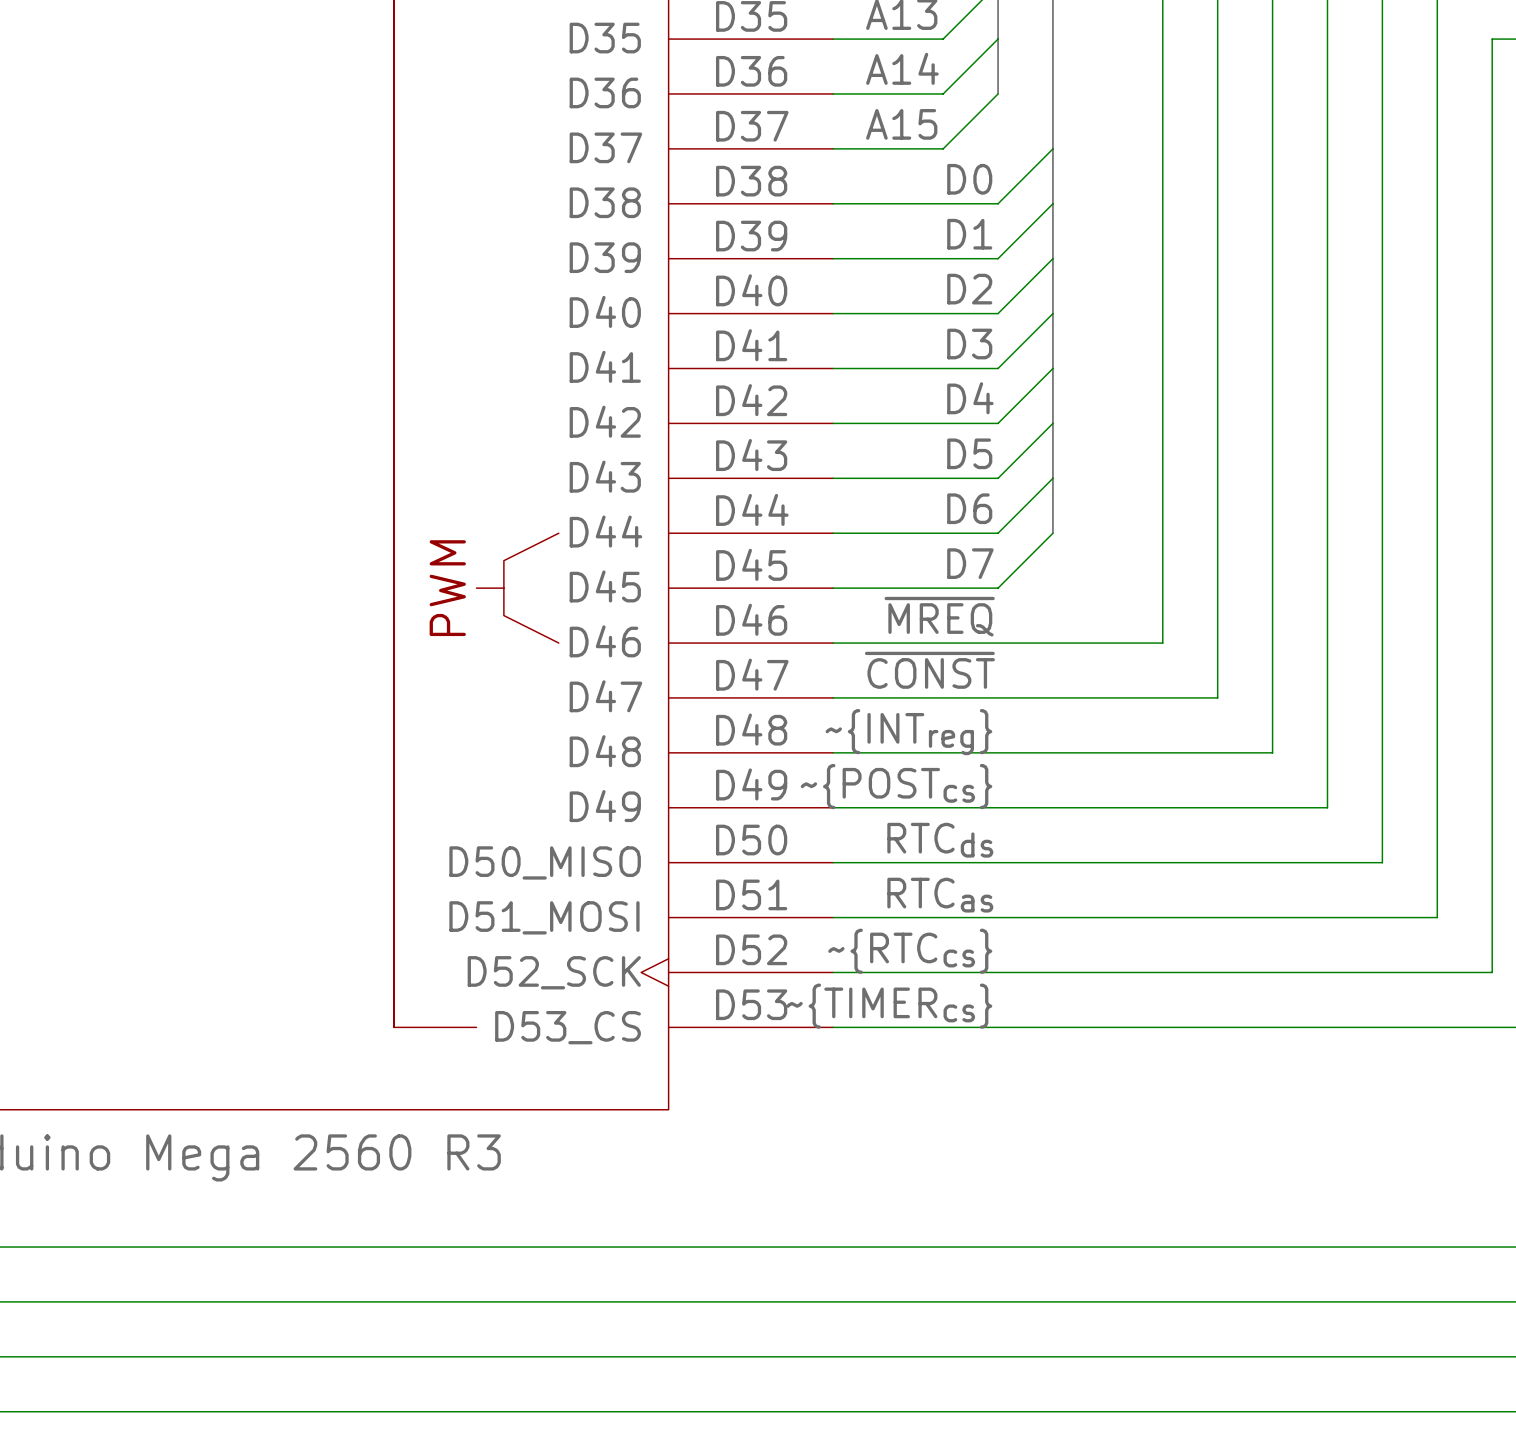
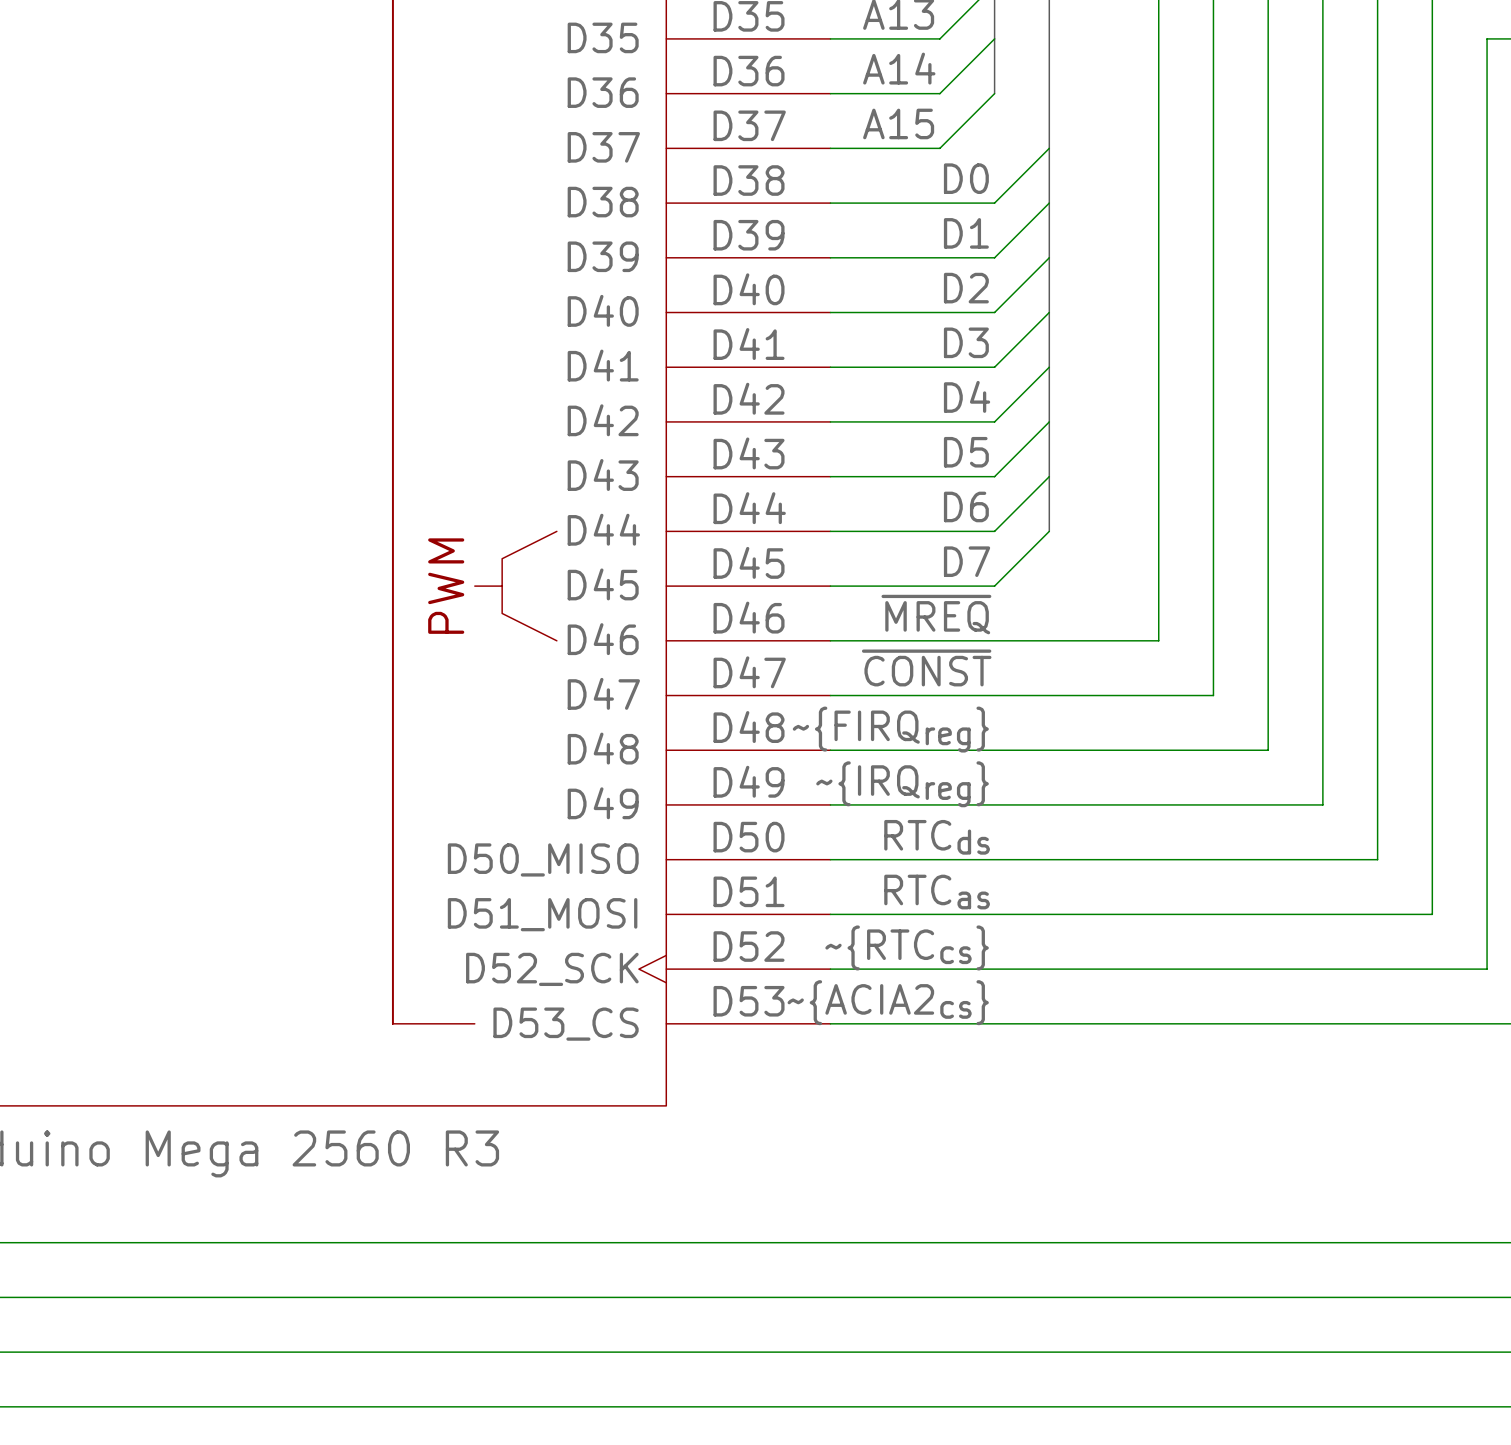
label: ~{INTreg} (908, 732) -> ~{FIRQreg} (890, 729)
label: ~{POSTcs} (896, 786) -> ~{IRQreg} (902, 784)
label: ~{TIMERcs} (889, 1006) -> ~{ACIA2cs} (888, 1002)

